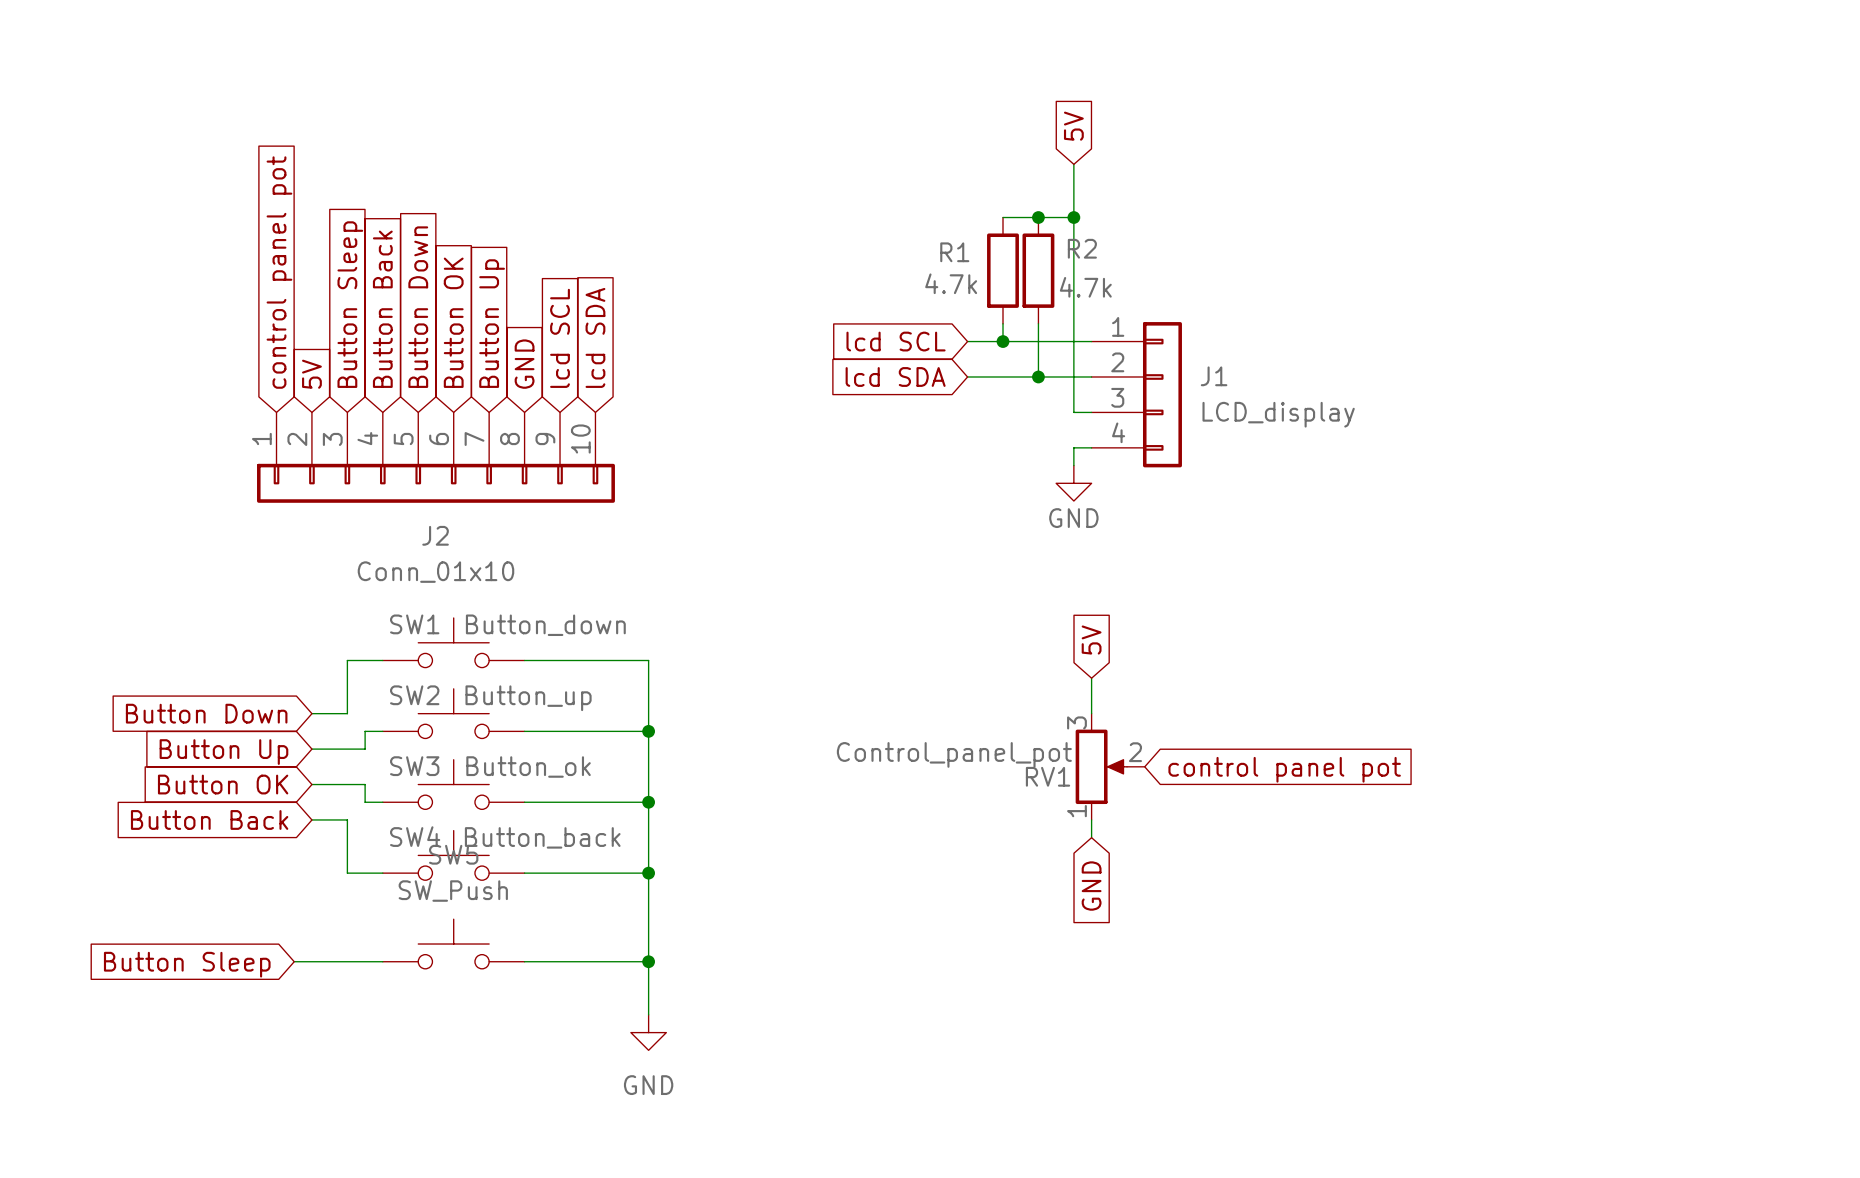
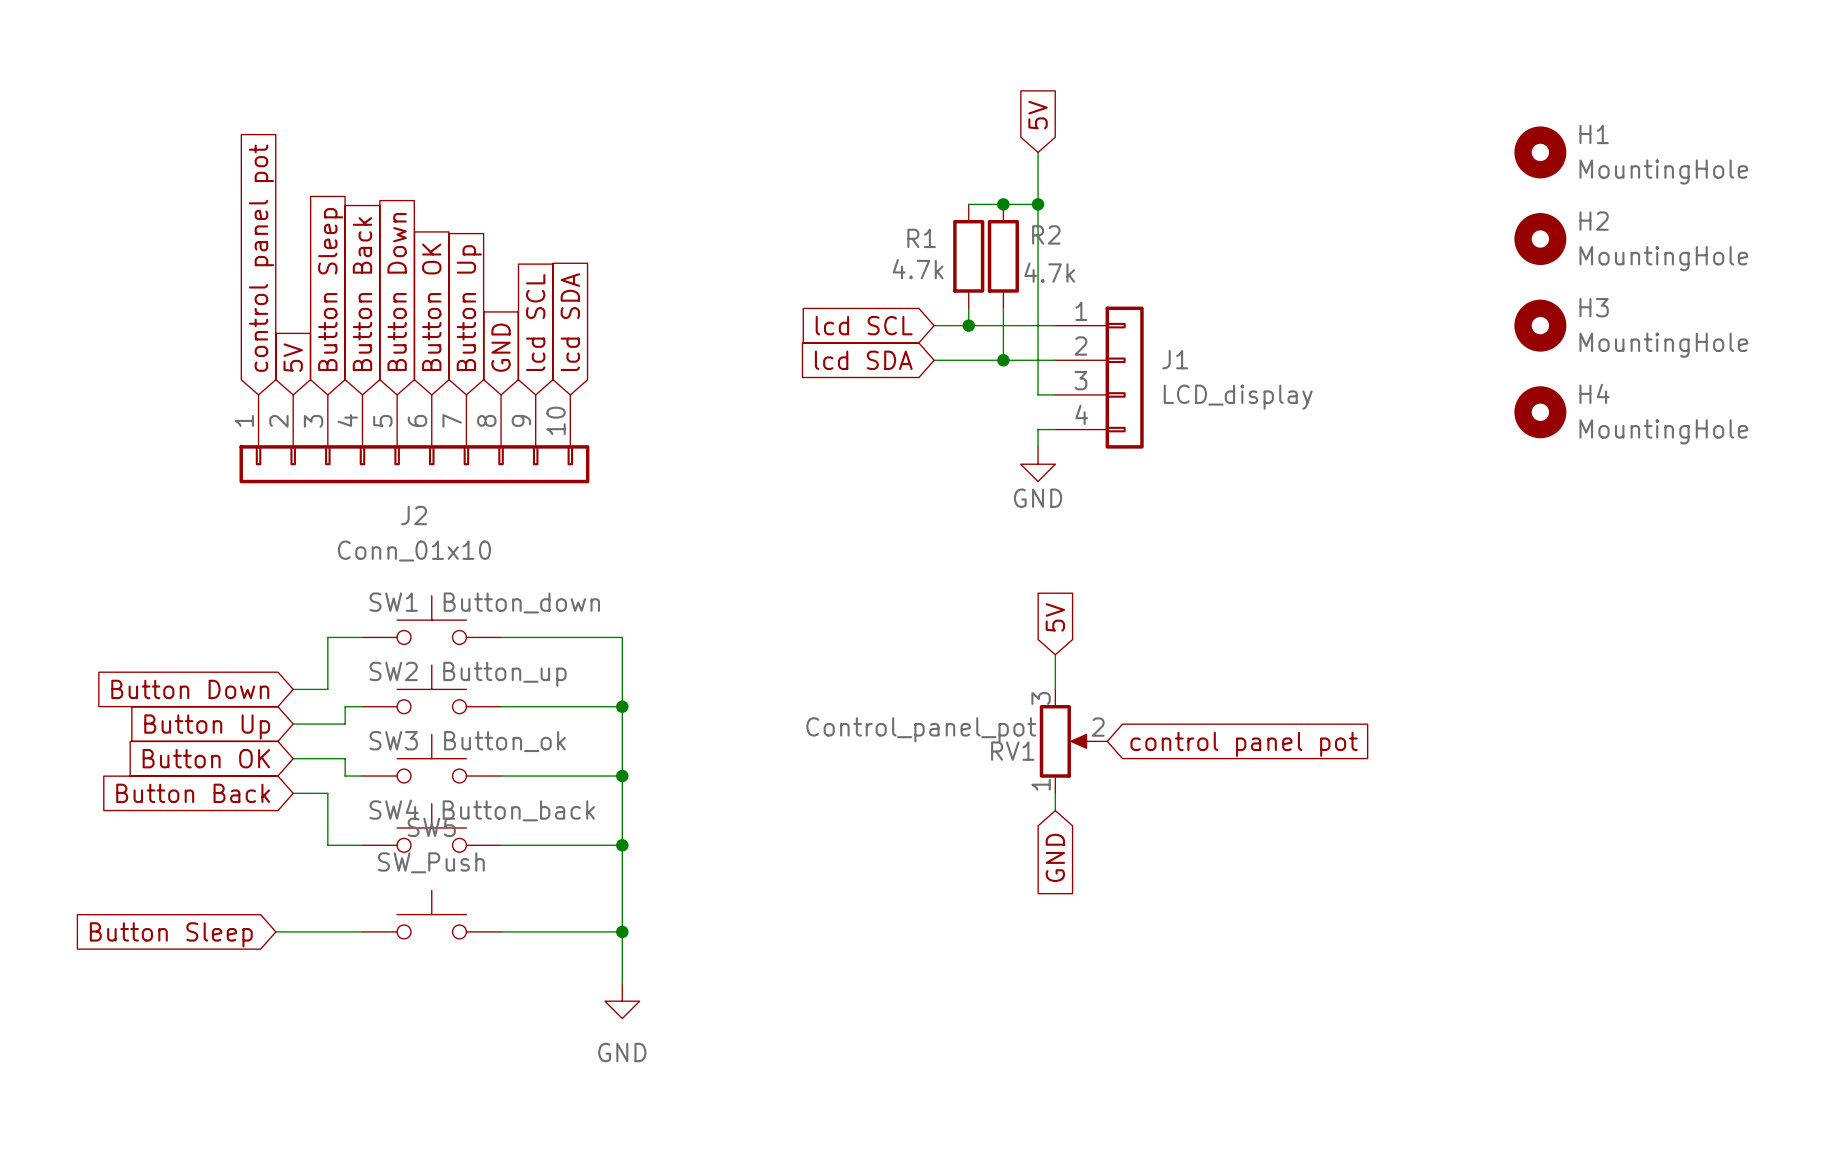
H1: none -> MountingHole (1540, 152)
H2: none -> MountingHole (1540, 239)
H3: none -> MountingHole (1540, 325)
H4: none -> MountingHole (1540, 412)

